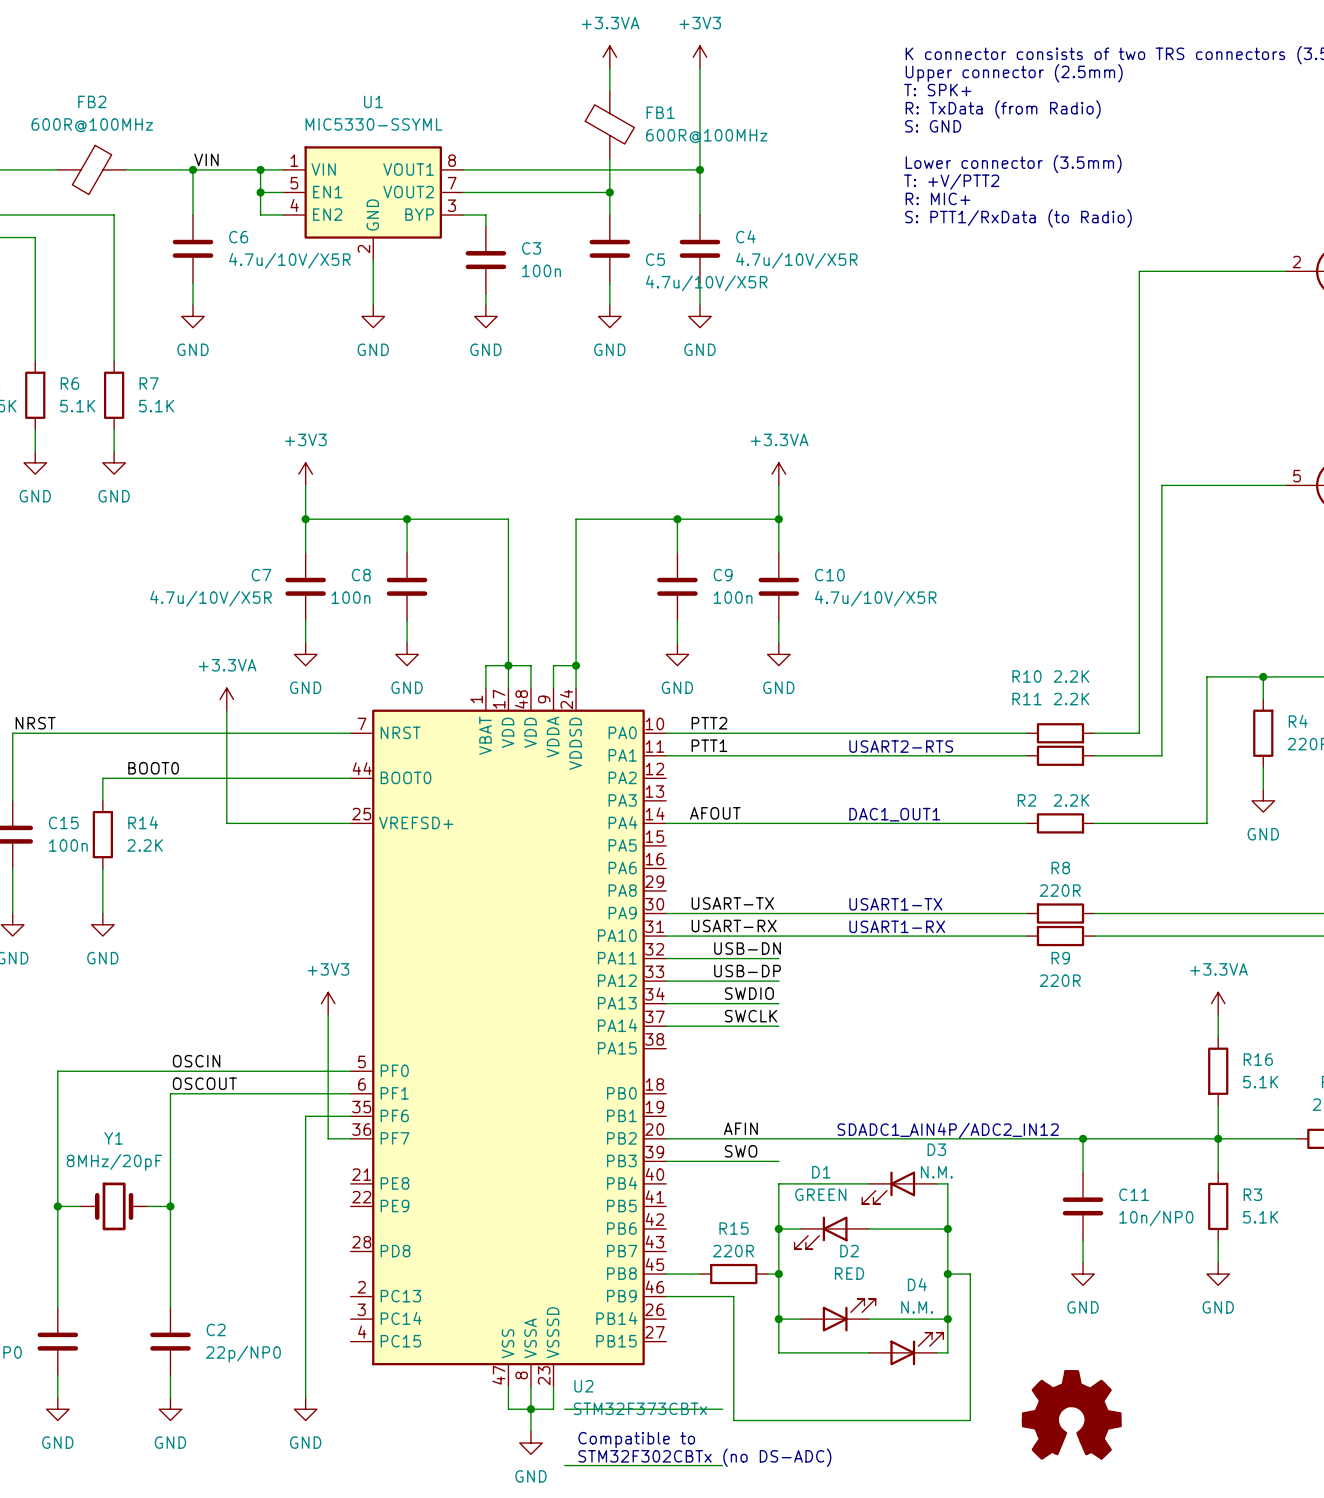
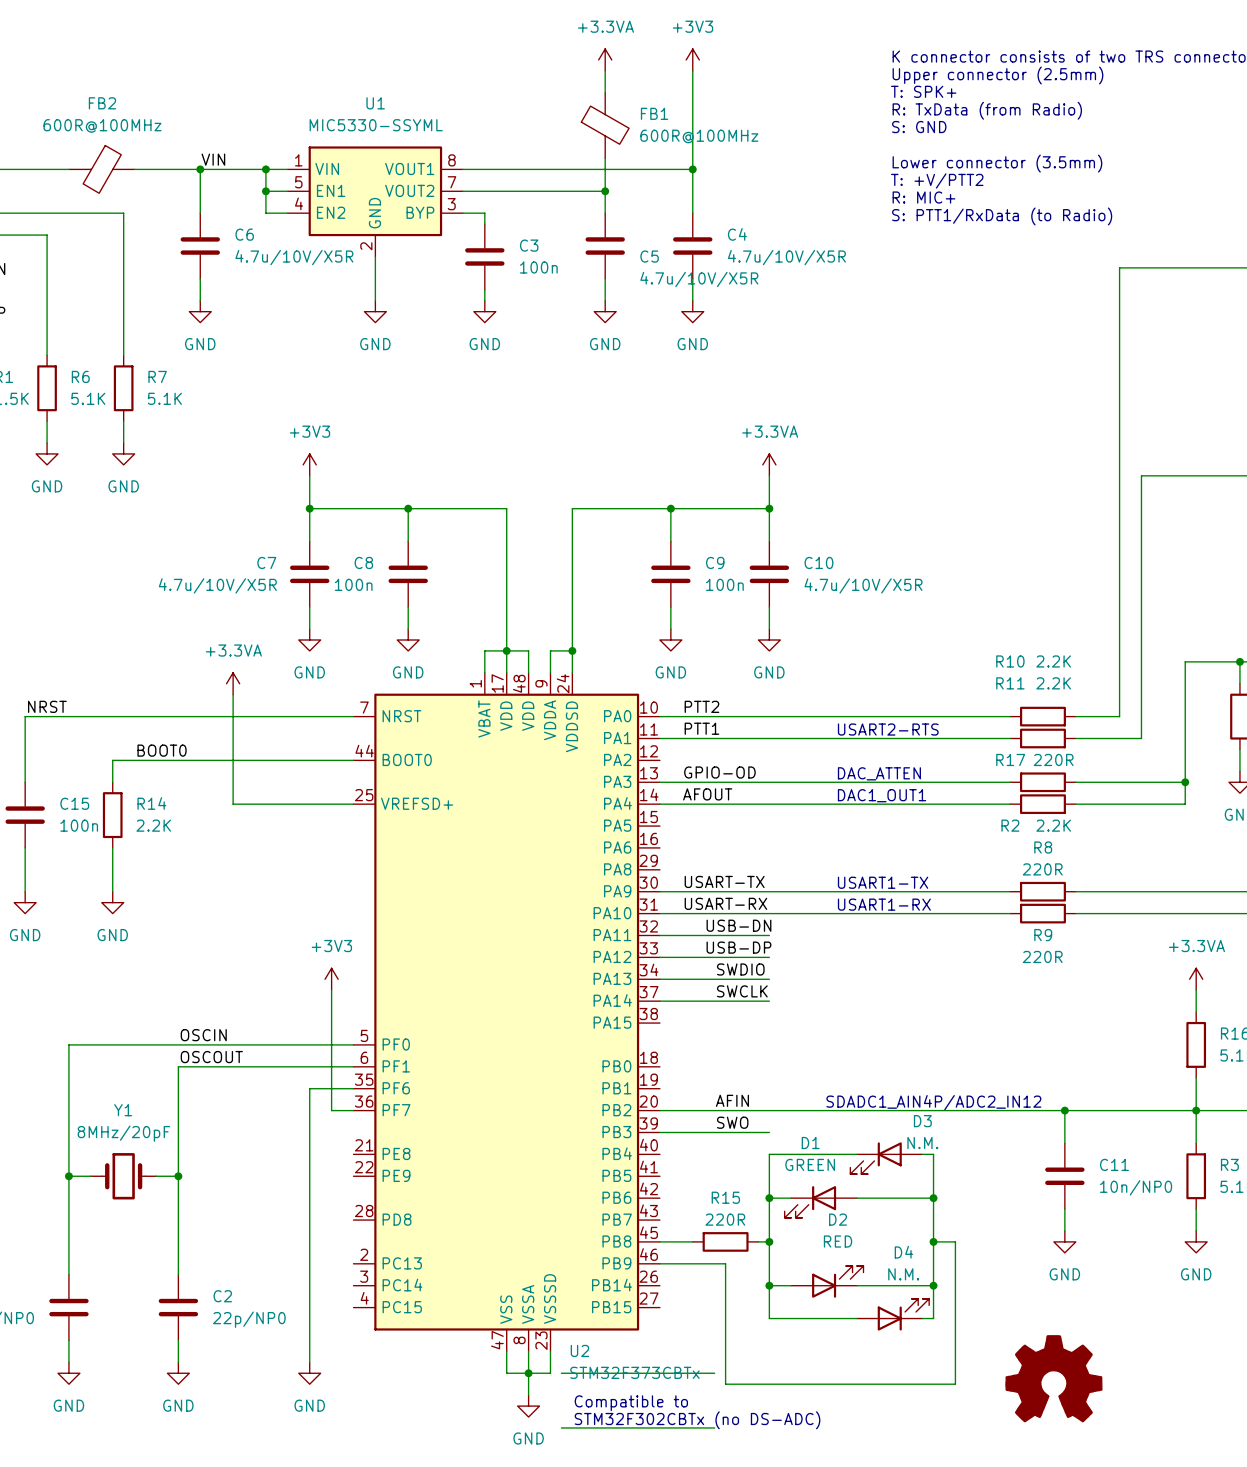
label: none -> GPIO-OD (719, 772)
text: none -> DAC_ATTEN (879, 773)
wire: none -> (659, 782) (1010, 782)
R2 name position: R2 (1026, 800) -> R2 (1010, 825)
R17: none -> 220R (1042, 782)
R2 value position: 2.2K (1071, 800) -> 2.2K (1053, 825)
wire: none -> (1075, 782) (1185, 782)
junction: none -> (1185, 782)

